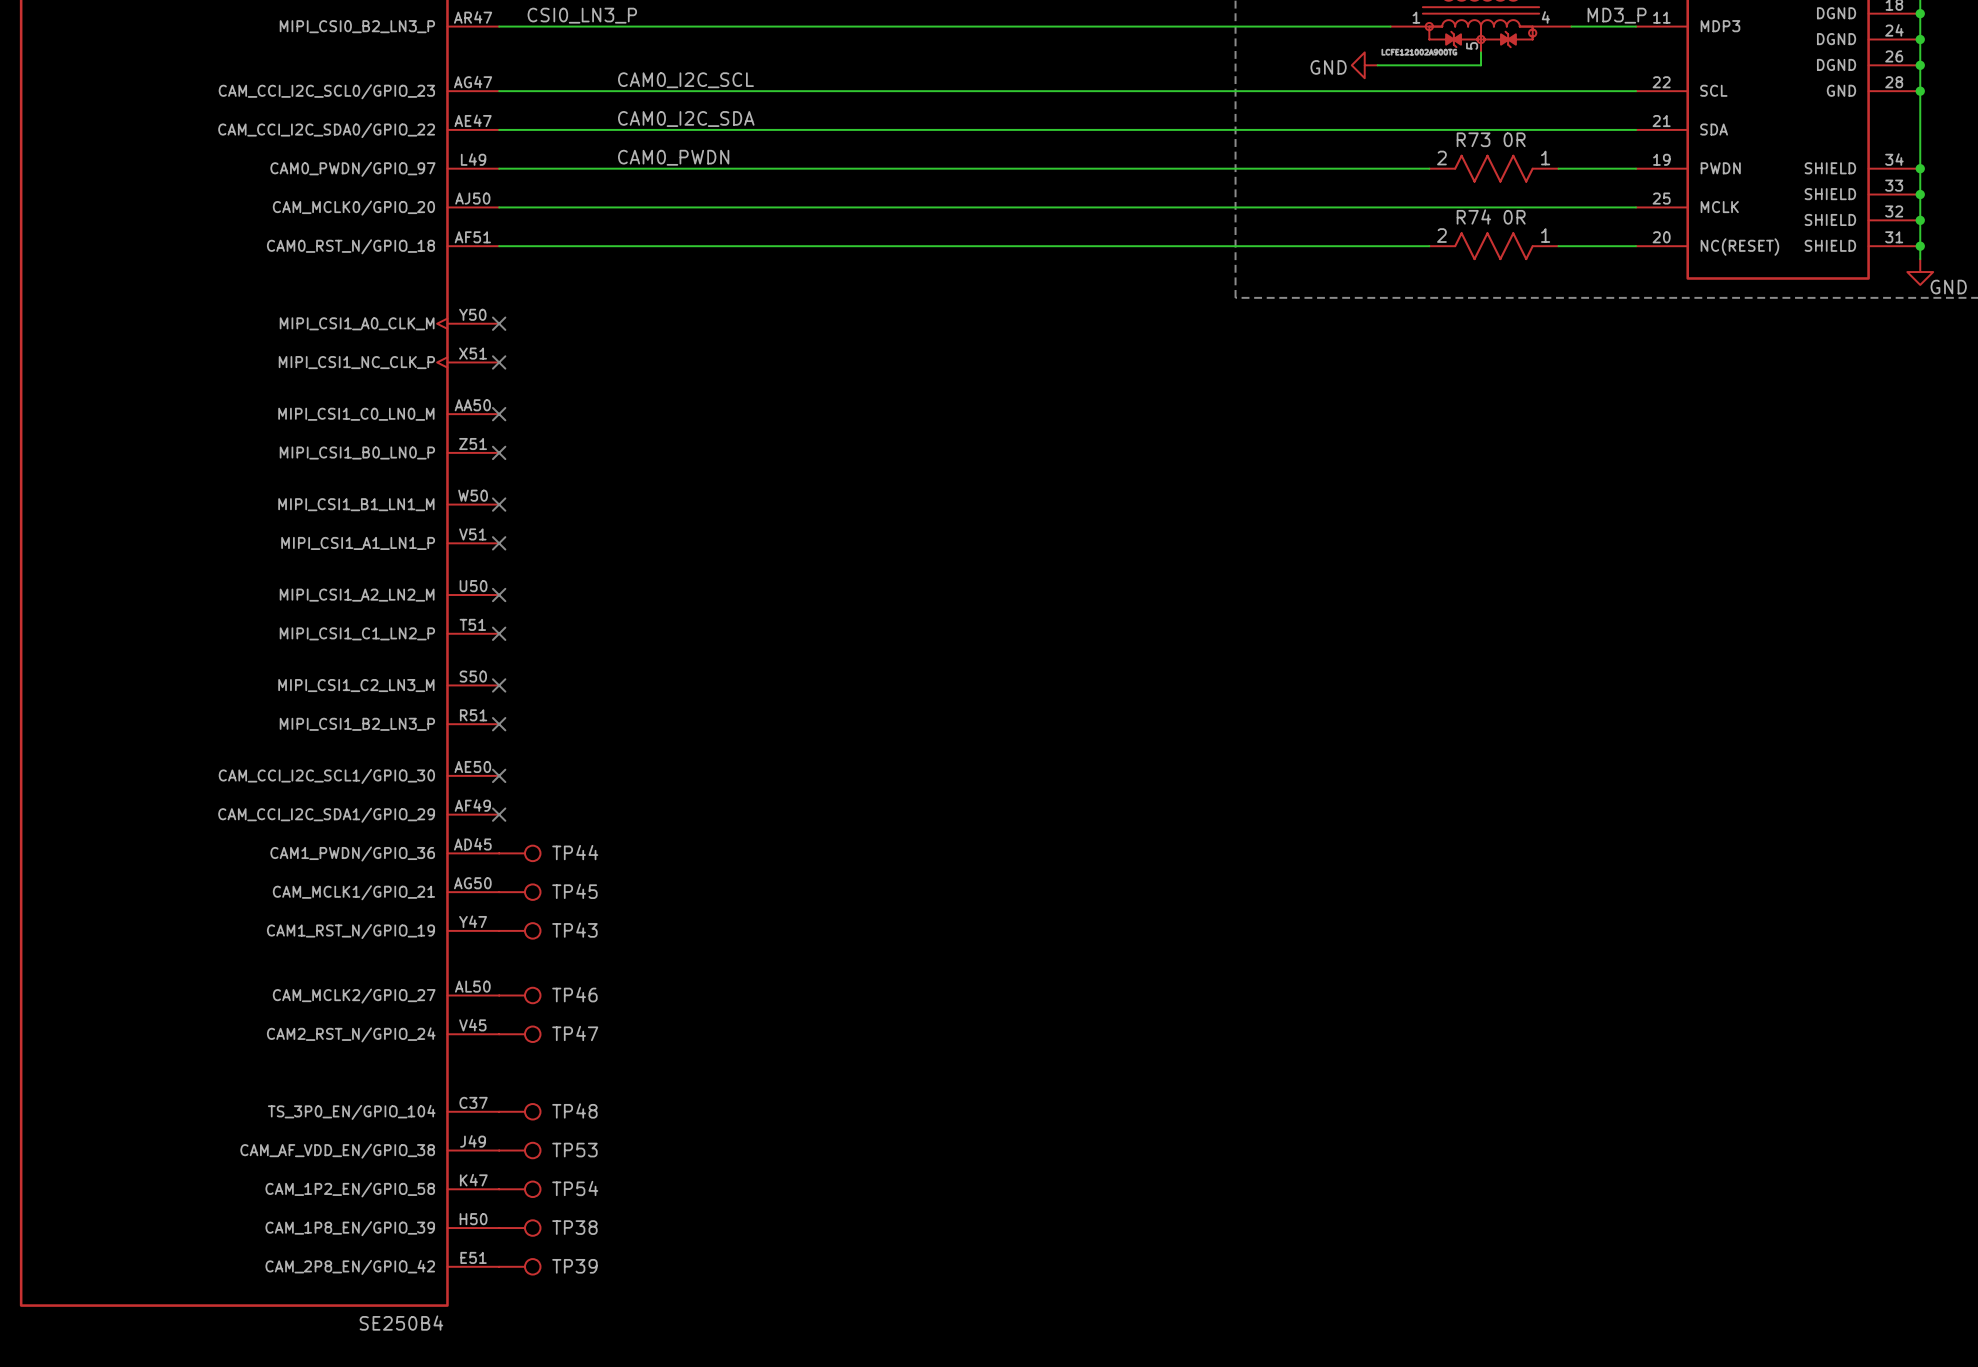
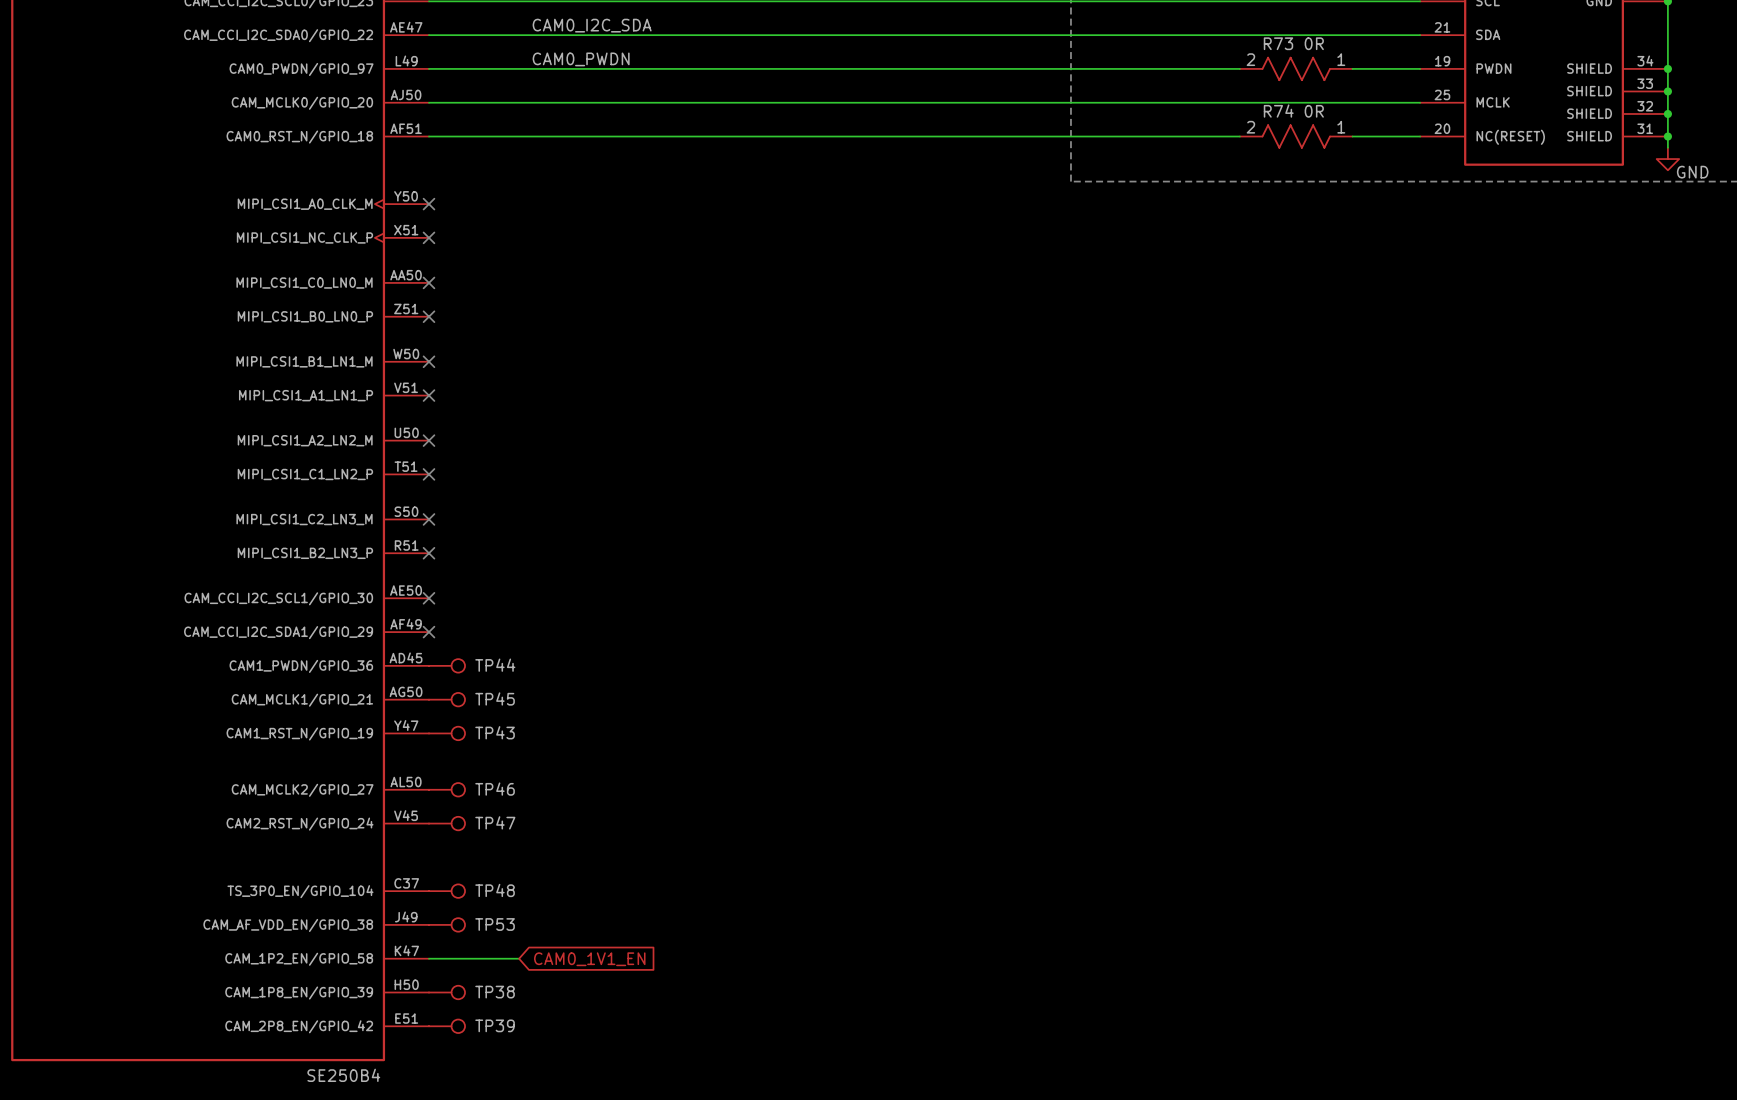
wire: none -> (428, 958) (519, 958)
TP54: (519, 1189) -> none
global label: none -> CAM0_1V1_EN (589, 959)

